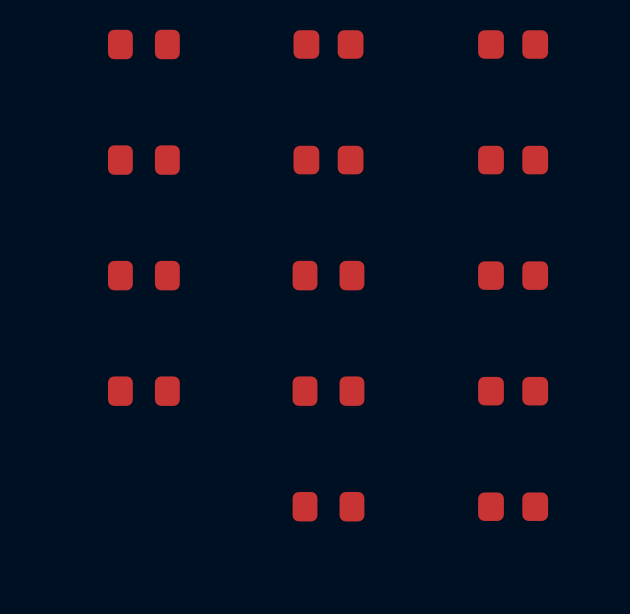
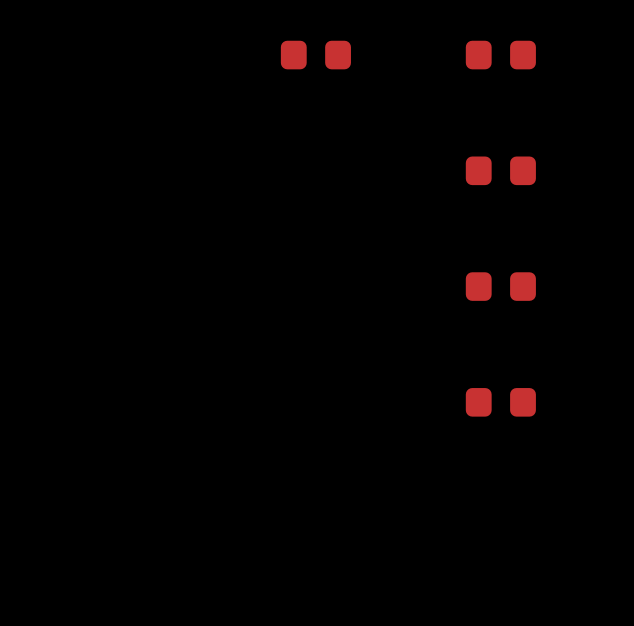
part: (143, 44) -> none
part: (143, 160) -> none
part: (328, 160) -> none
part: (143, 275) -> none
part: (328, 275) -> none
part: (143, 391) -> none
part: (328, 391) -> none
part: (328, 506) -> none
part: (513, 506) -> none

